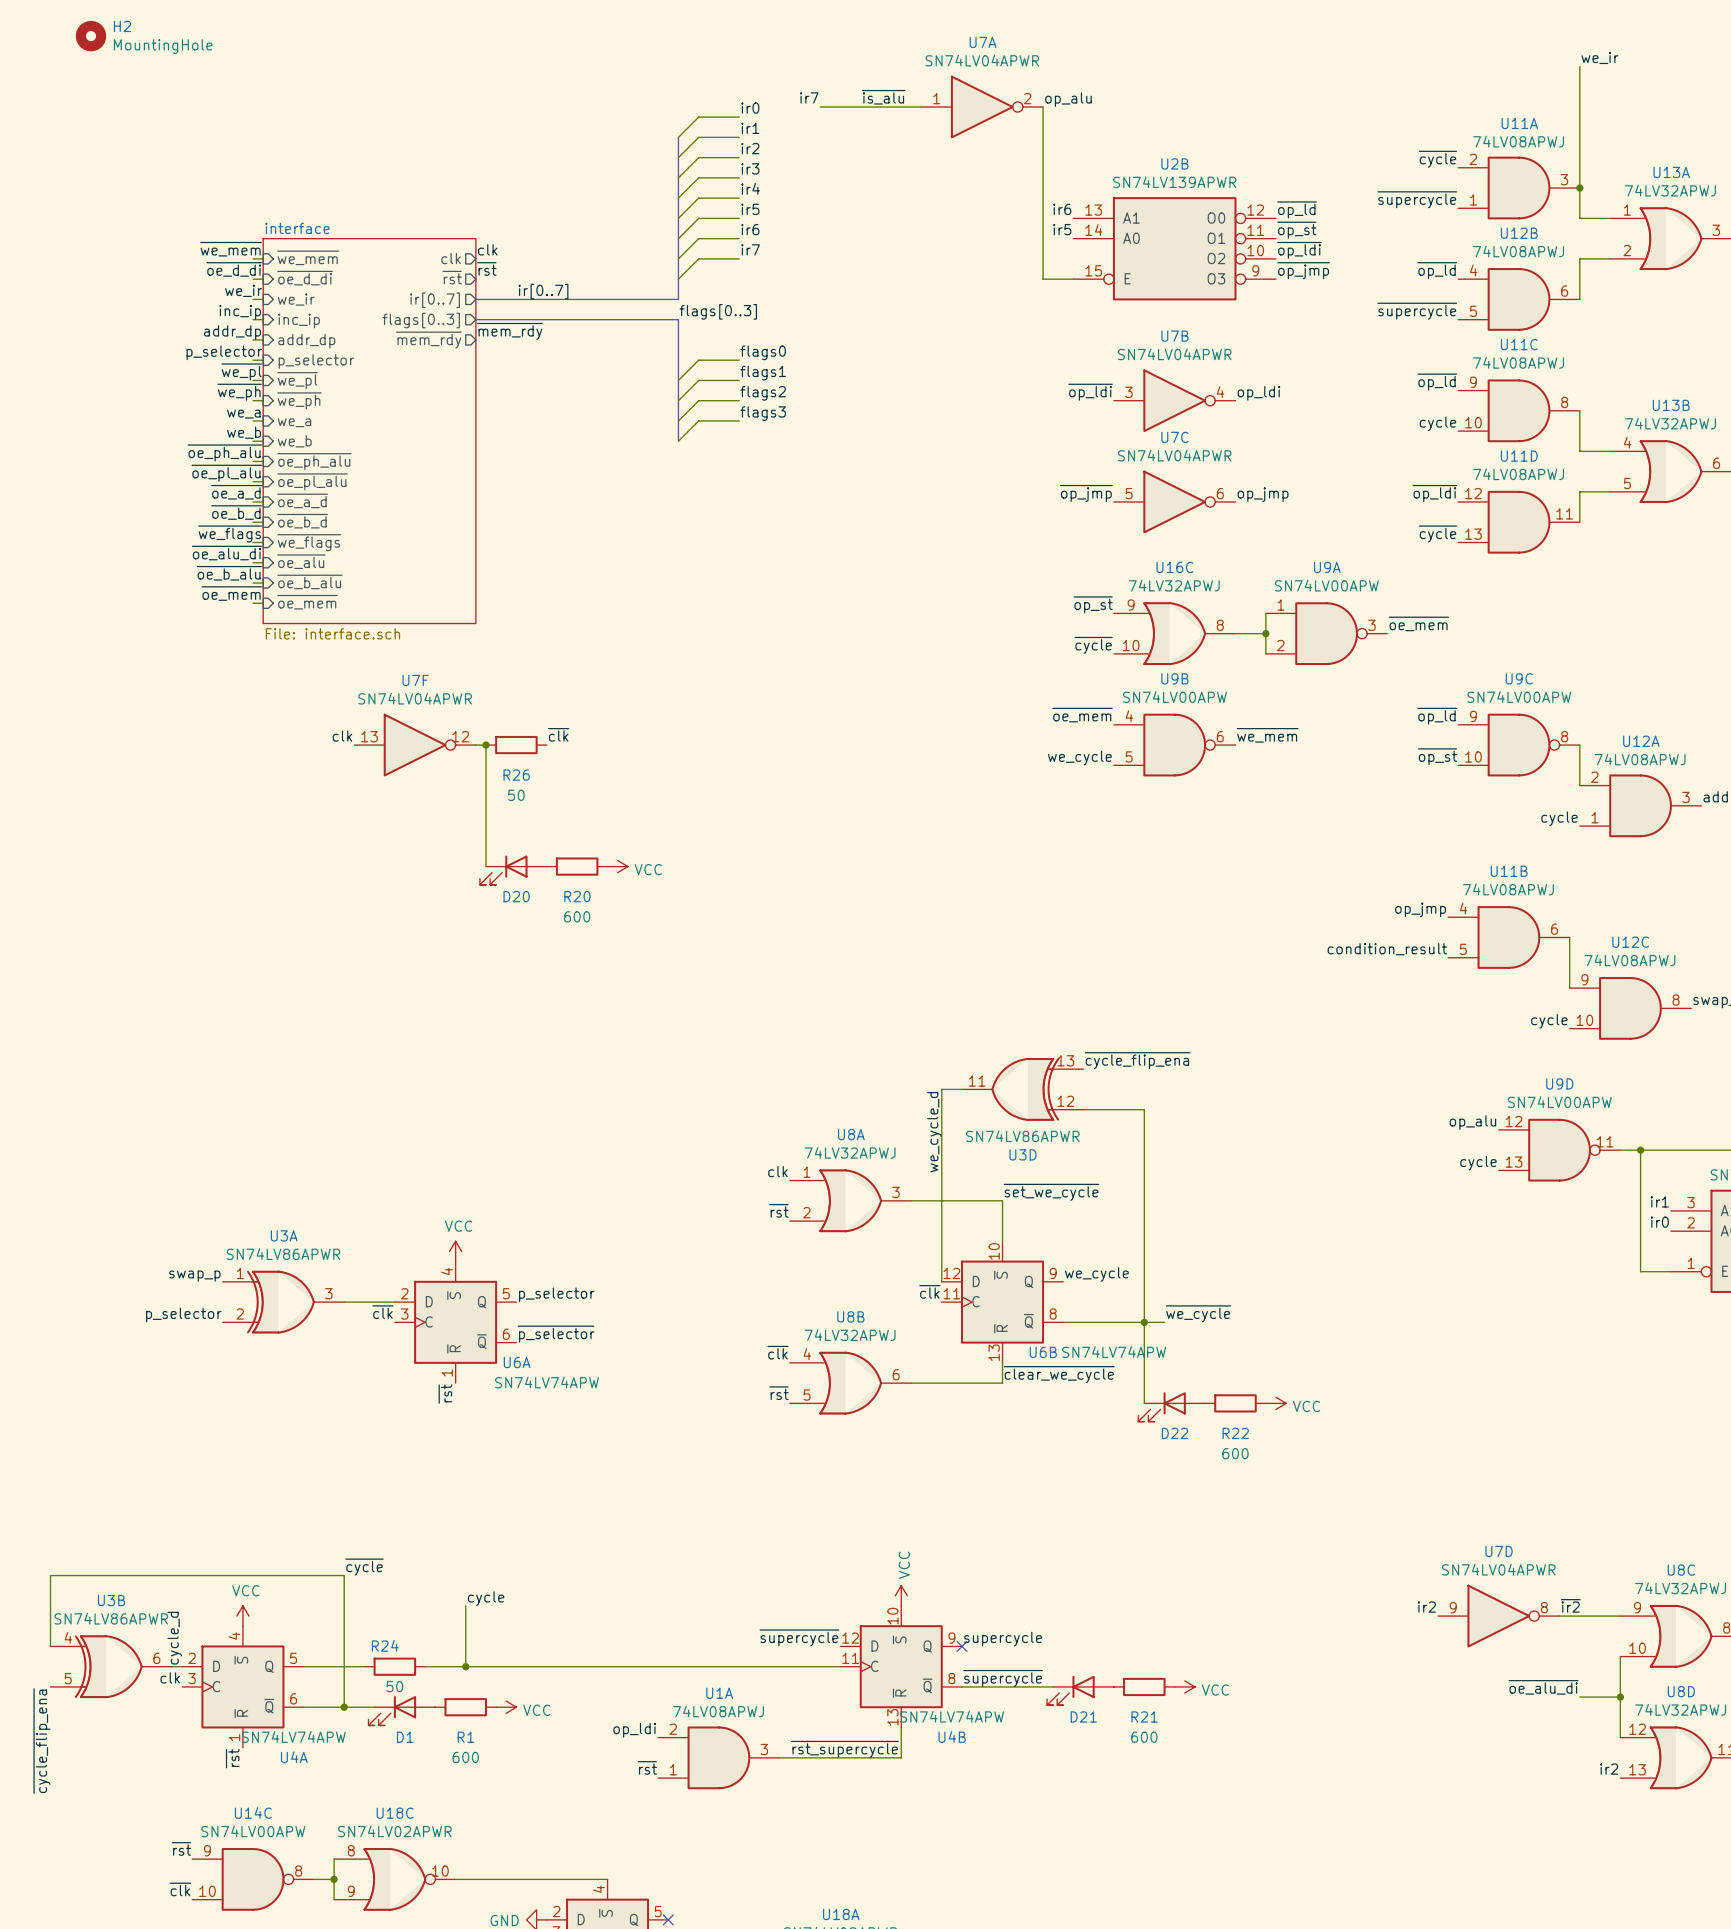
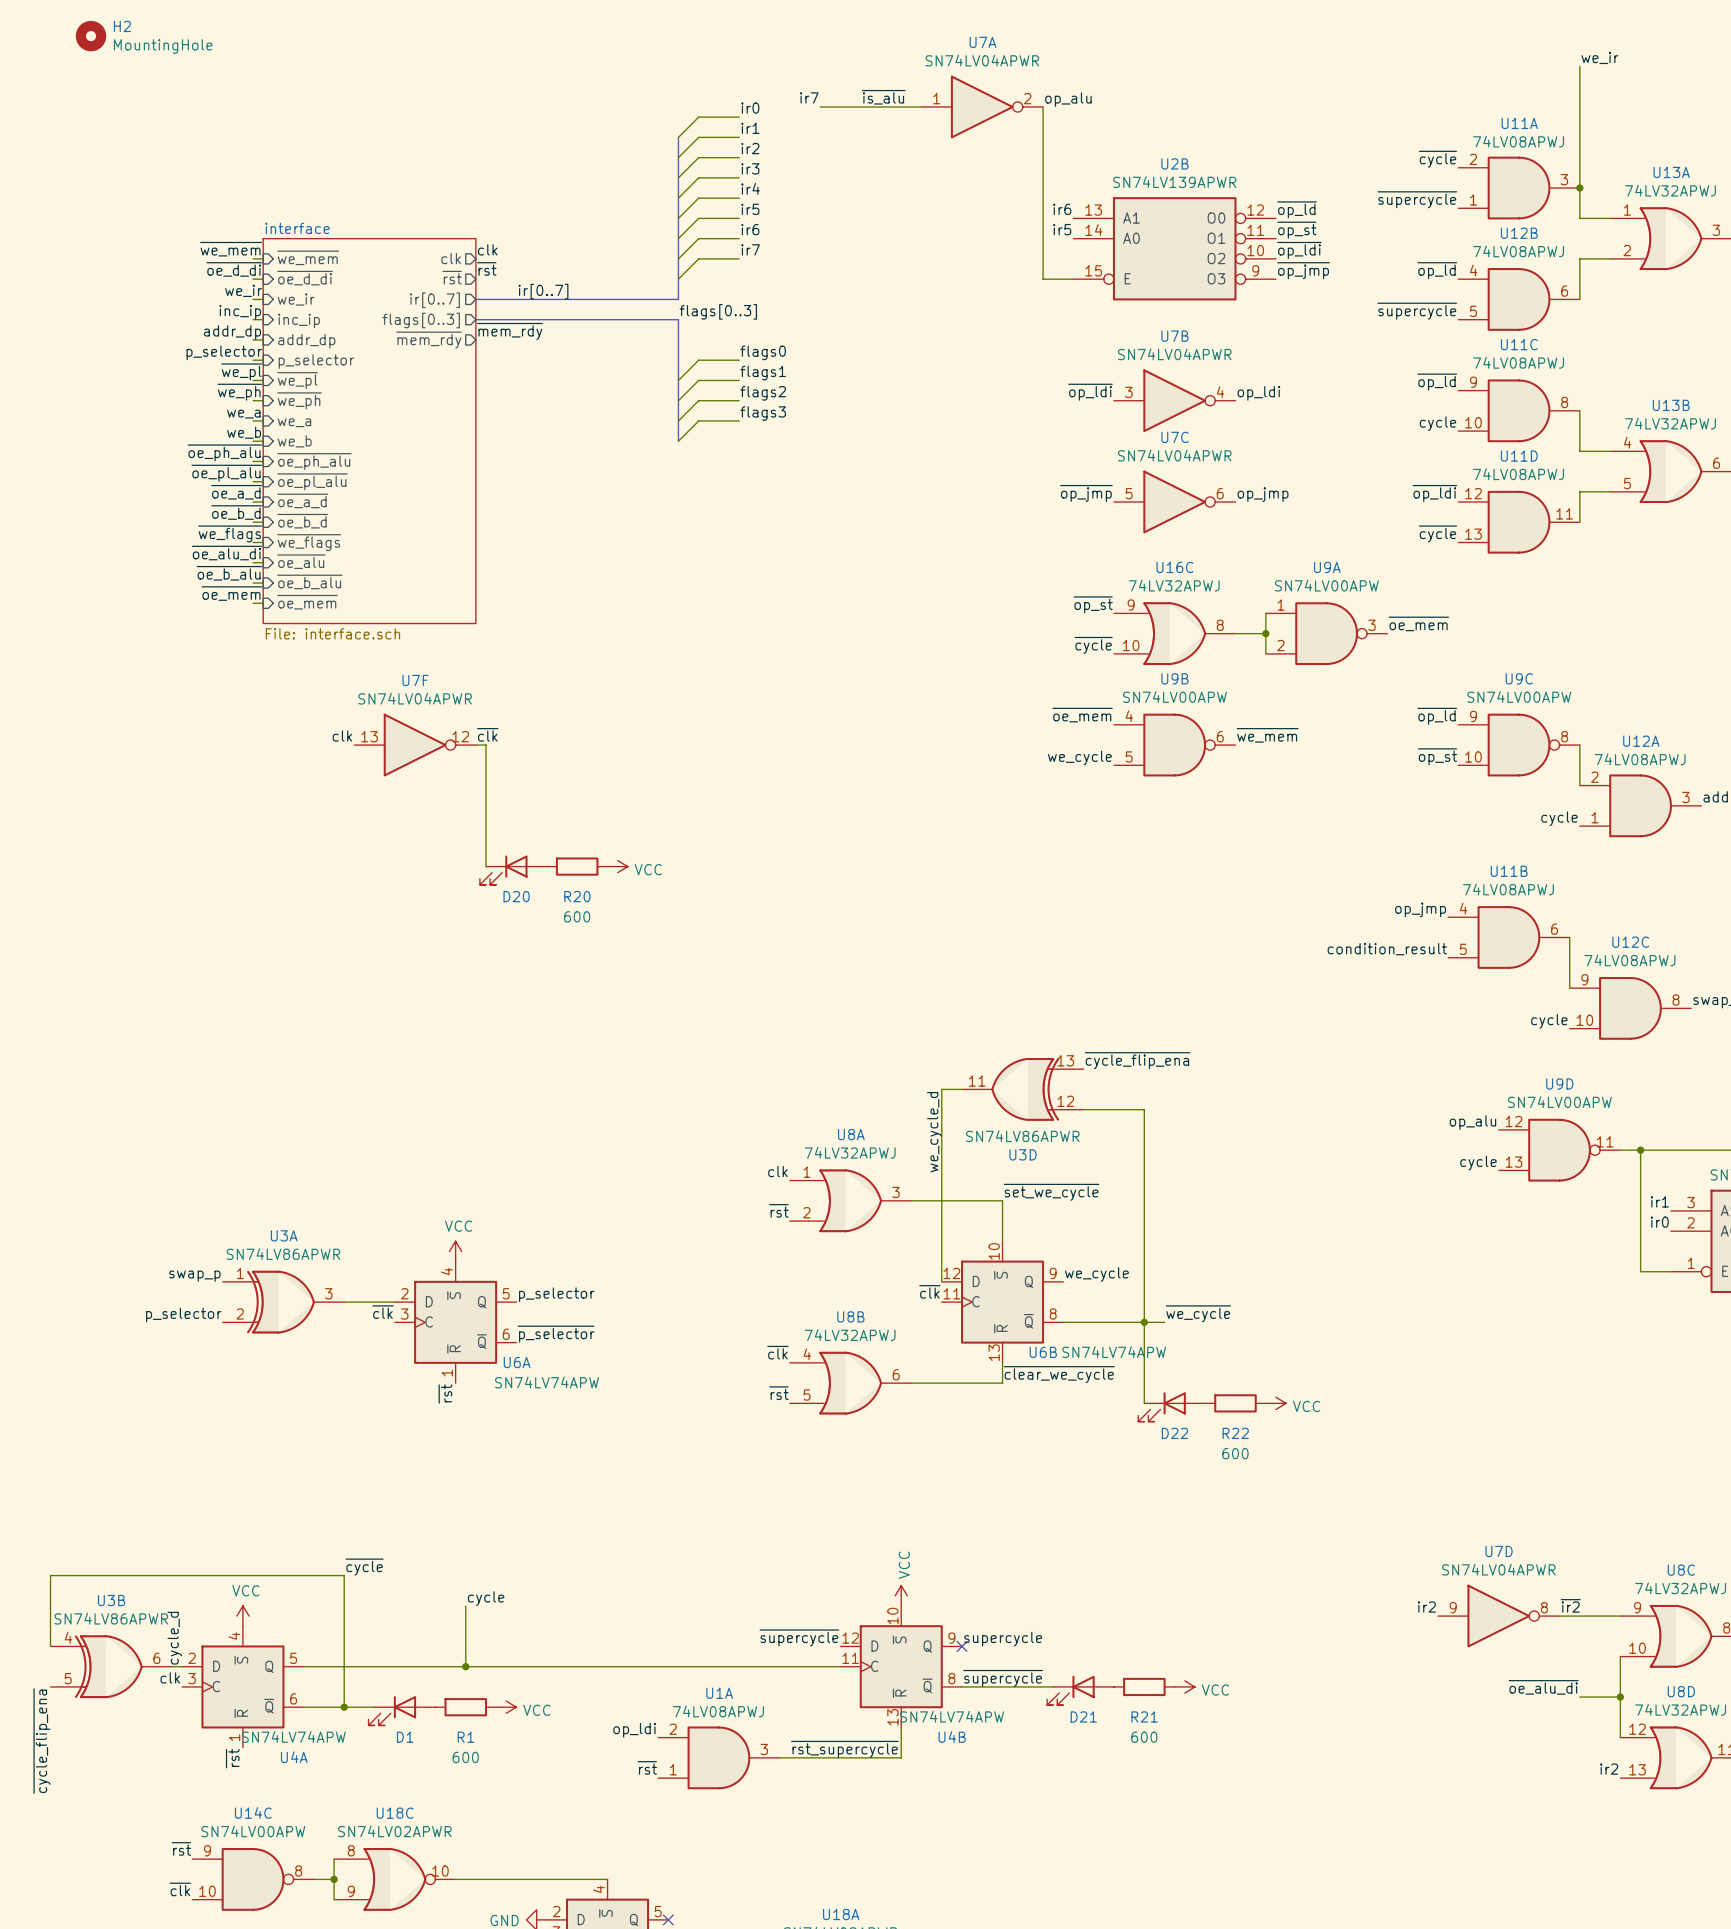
label position: ~{clk} (558, 734) -> ~{clk} (487, 734)
junction: (486, 745) -> none
R26: 50 (516, 745) -> none
wire: none -> (364, 1666) (425, 1666)
R24: 50 (394, 1666) -> none

